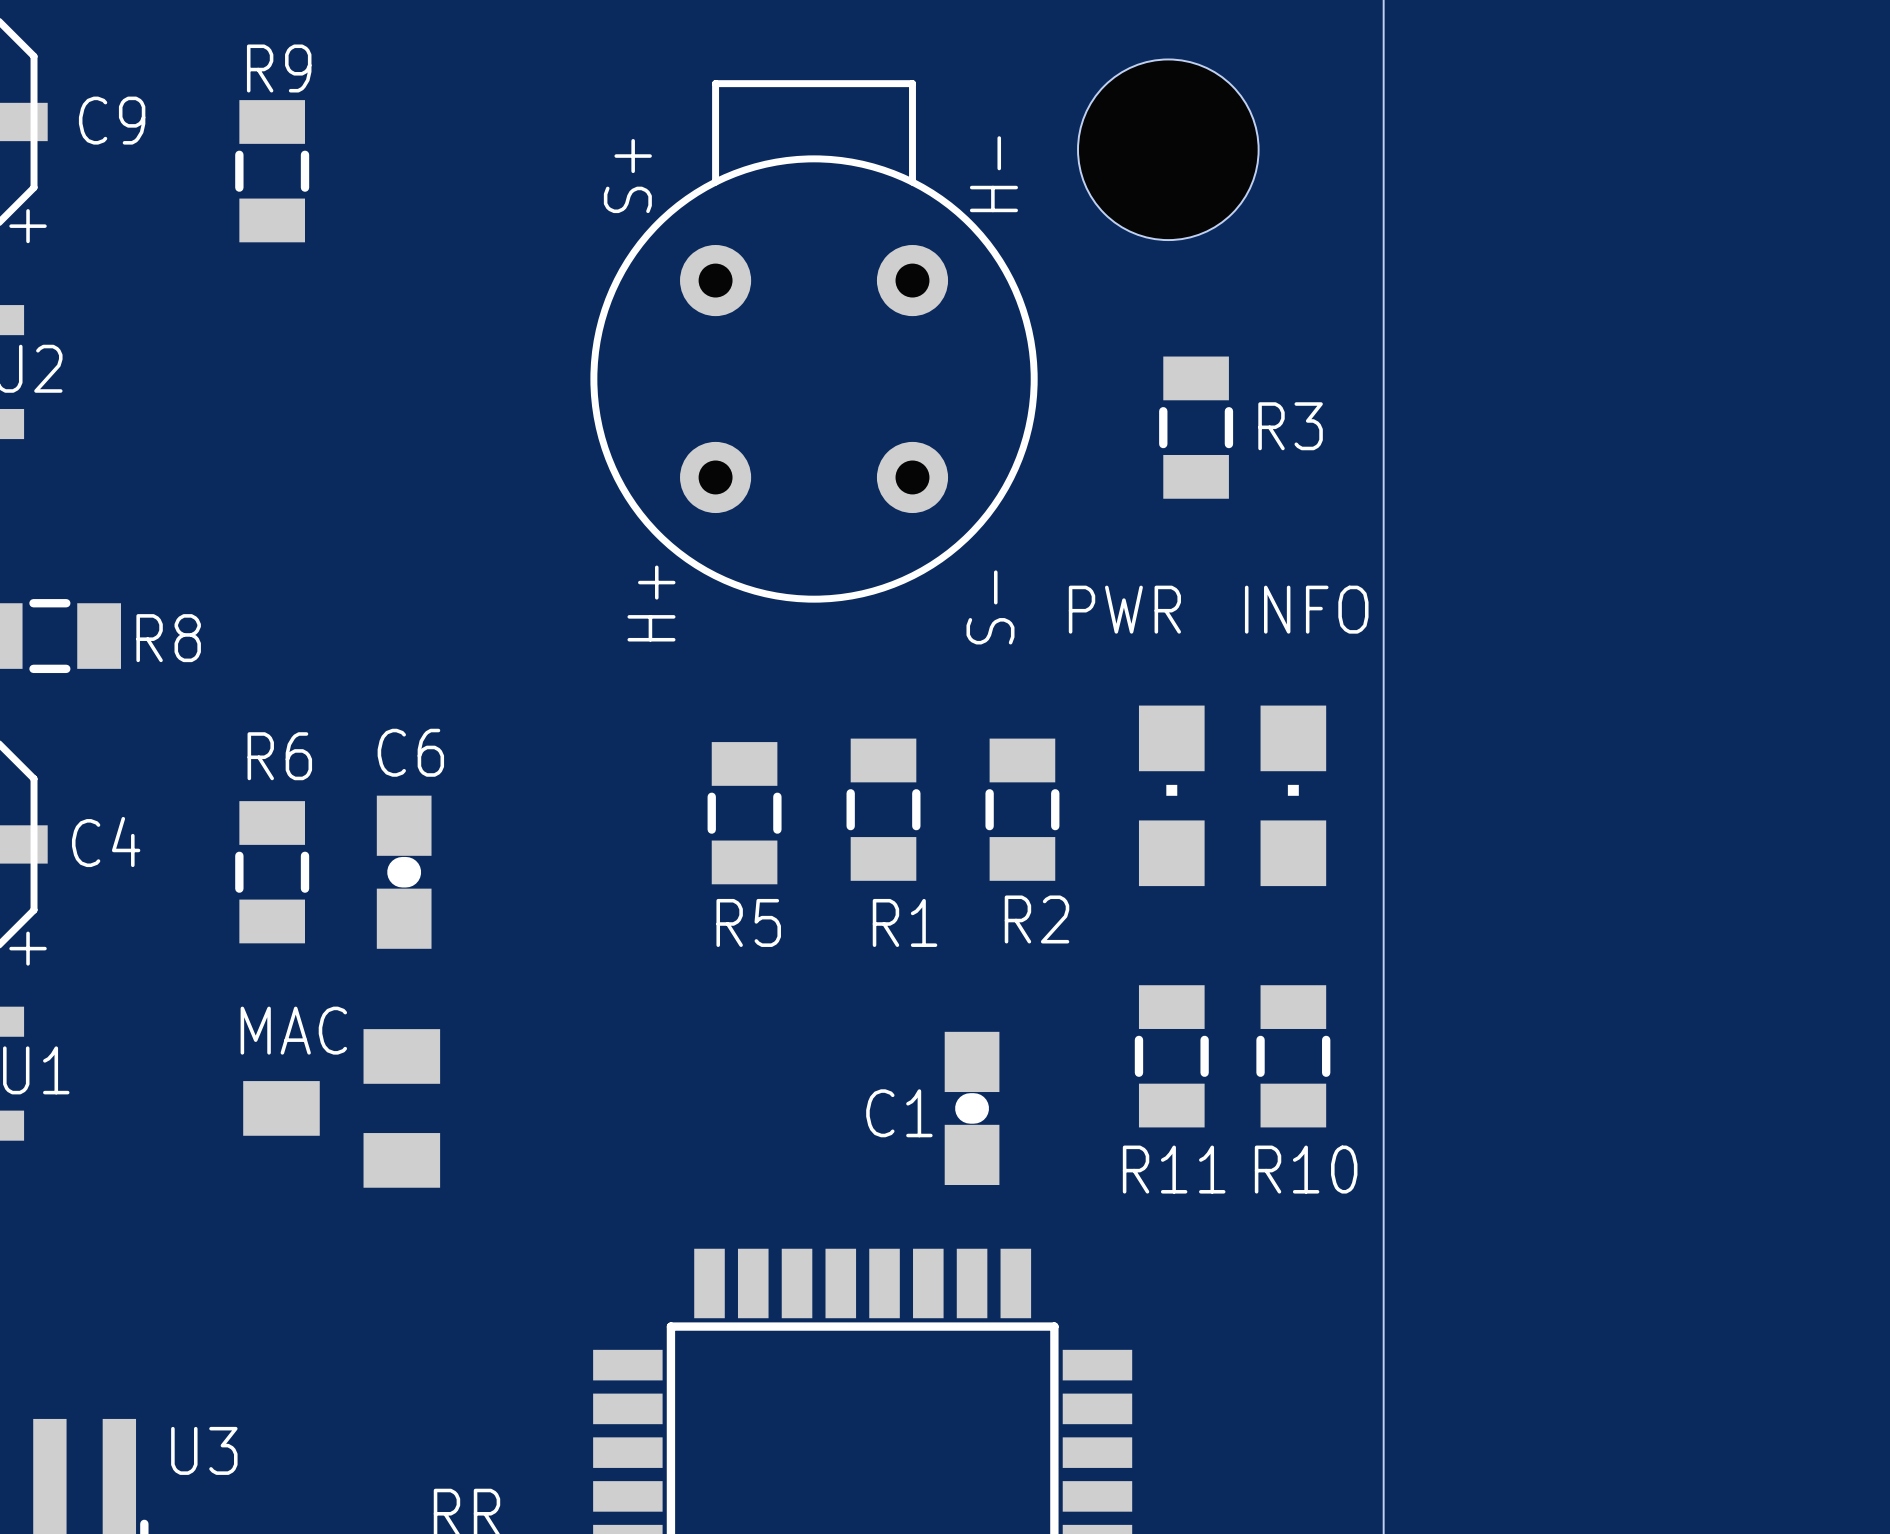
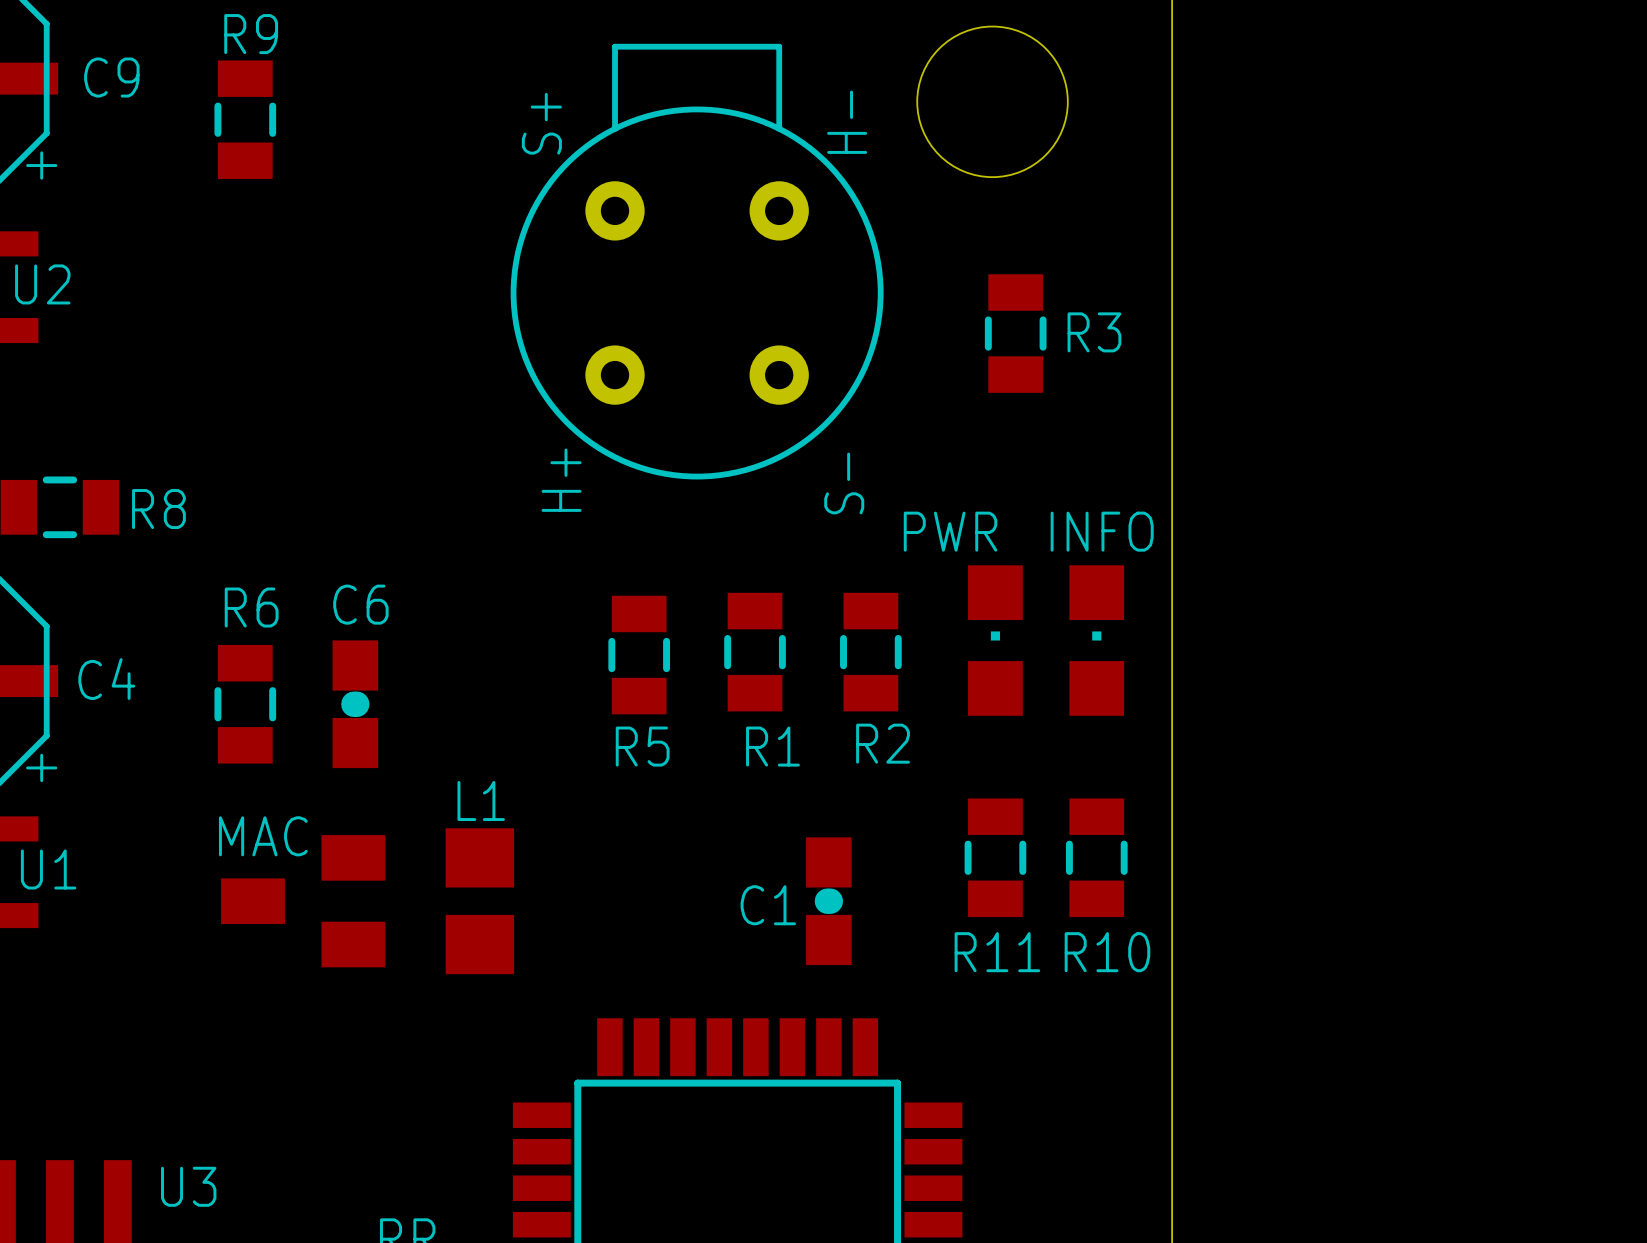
PWR name position: PWR (1124, 609) -> PWR (950, 531)
INFO name position: INFO (1306, 609) -> INFO (1102, 531)
L1: none -> (479, 901)

